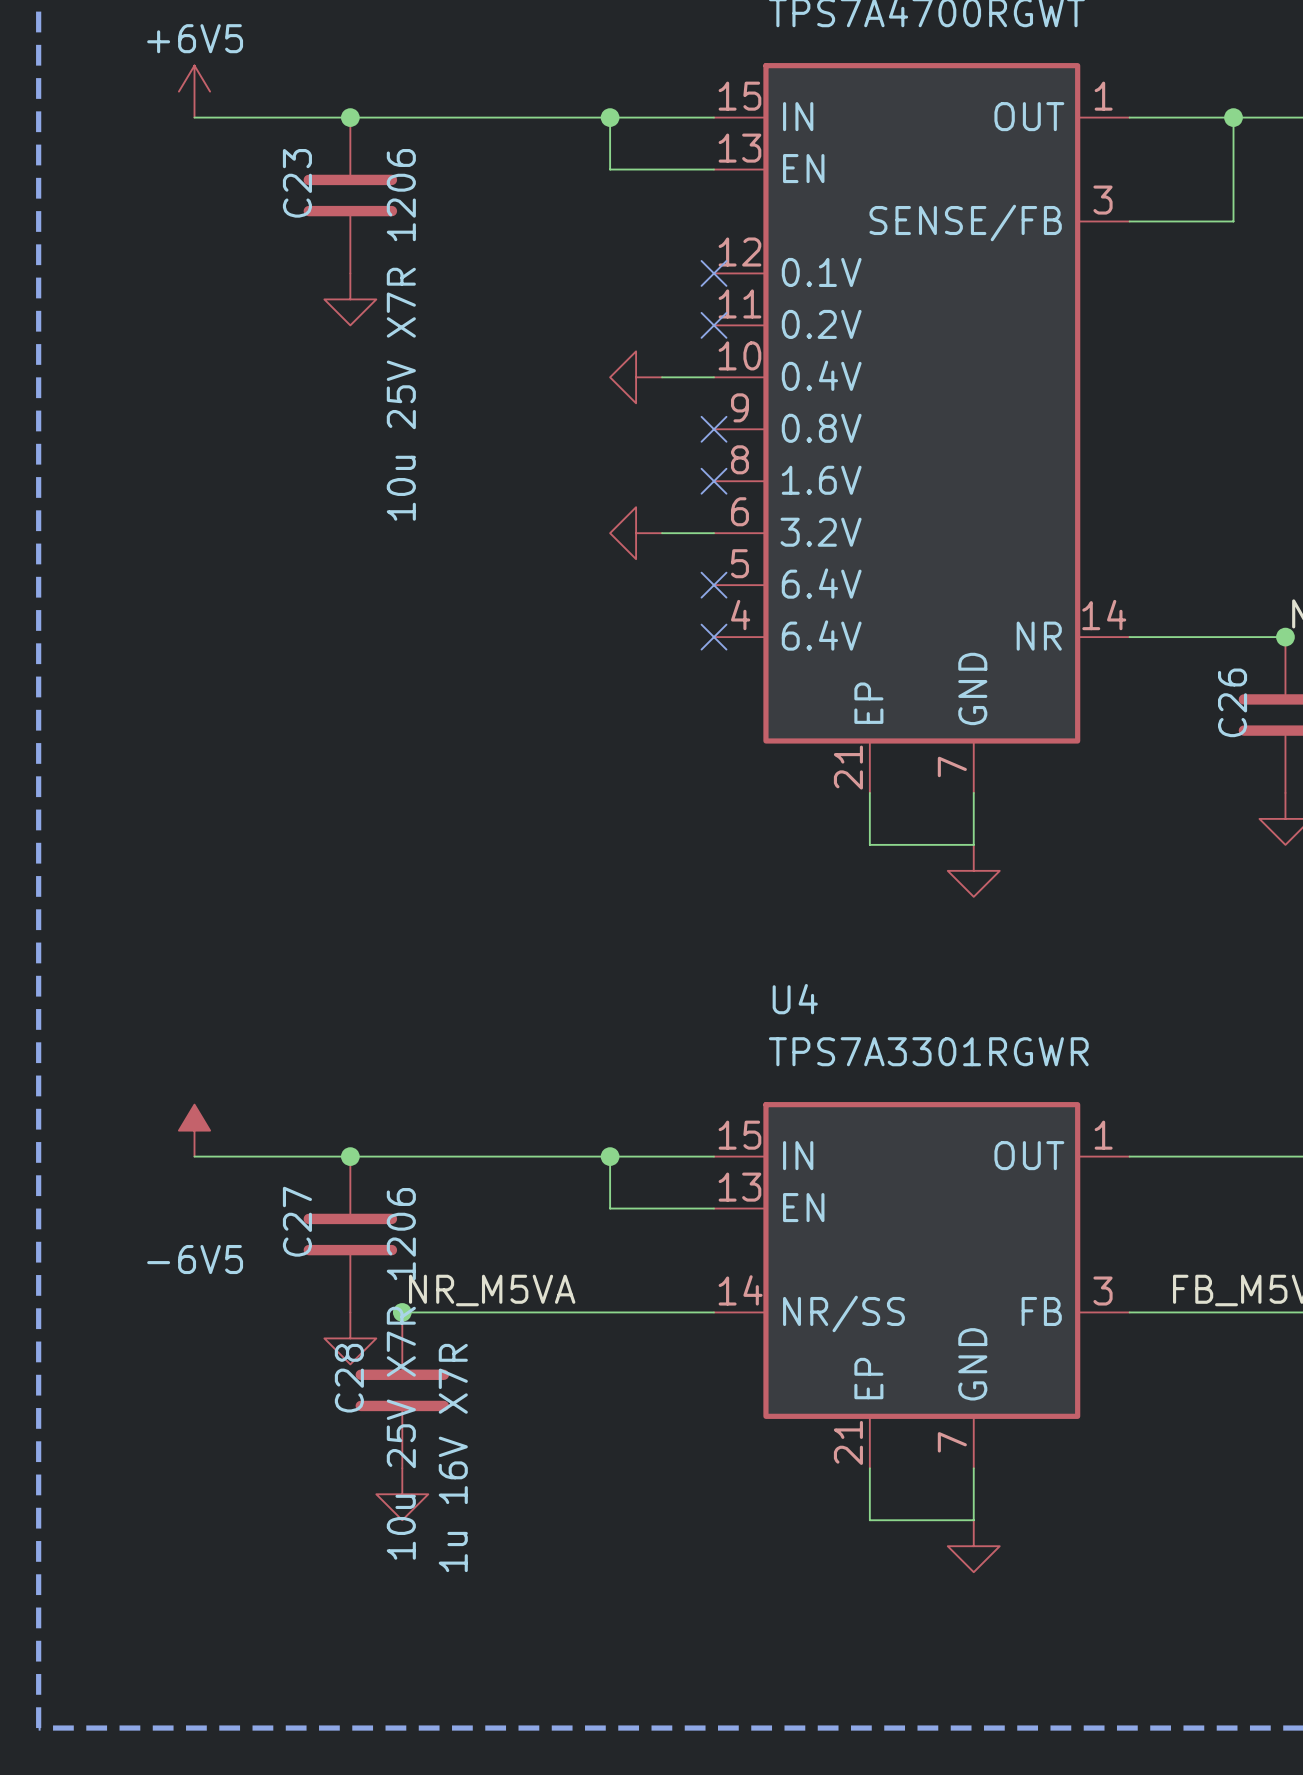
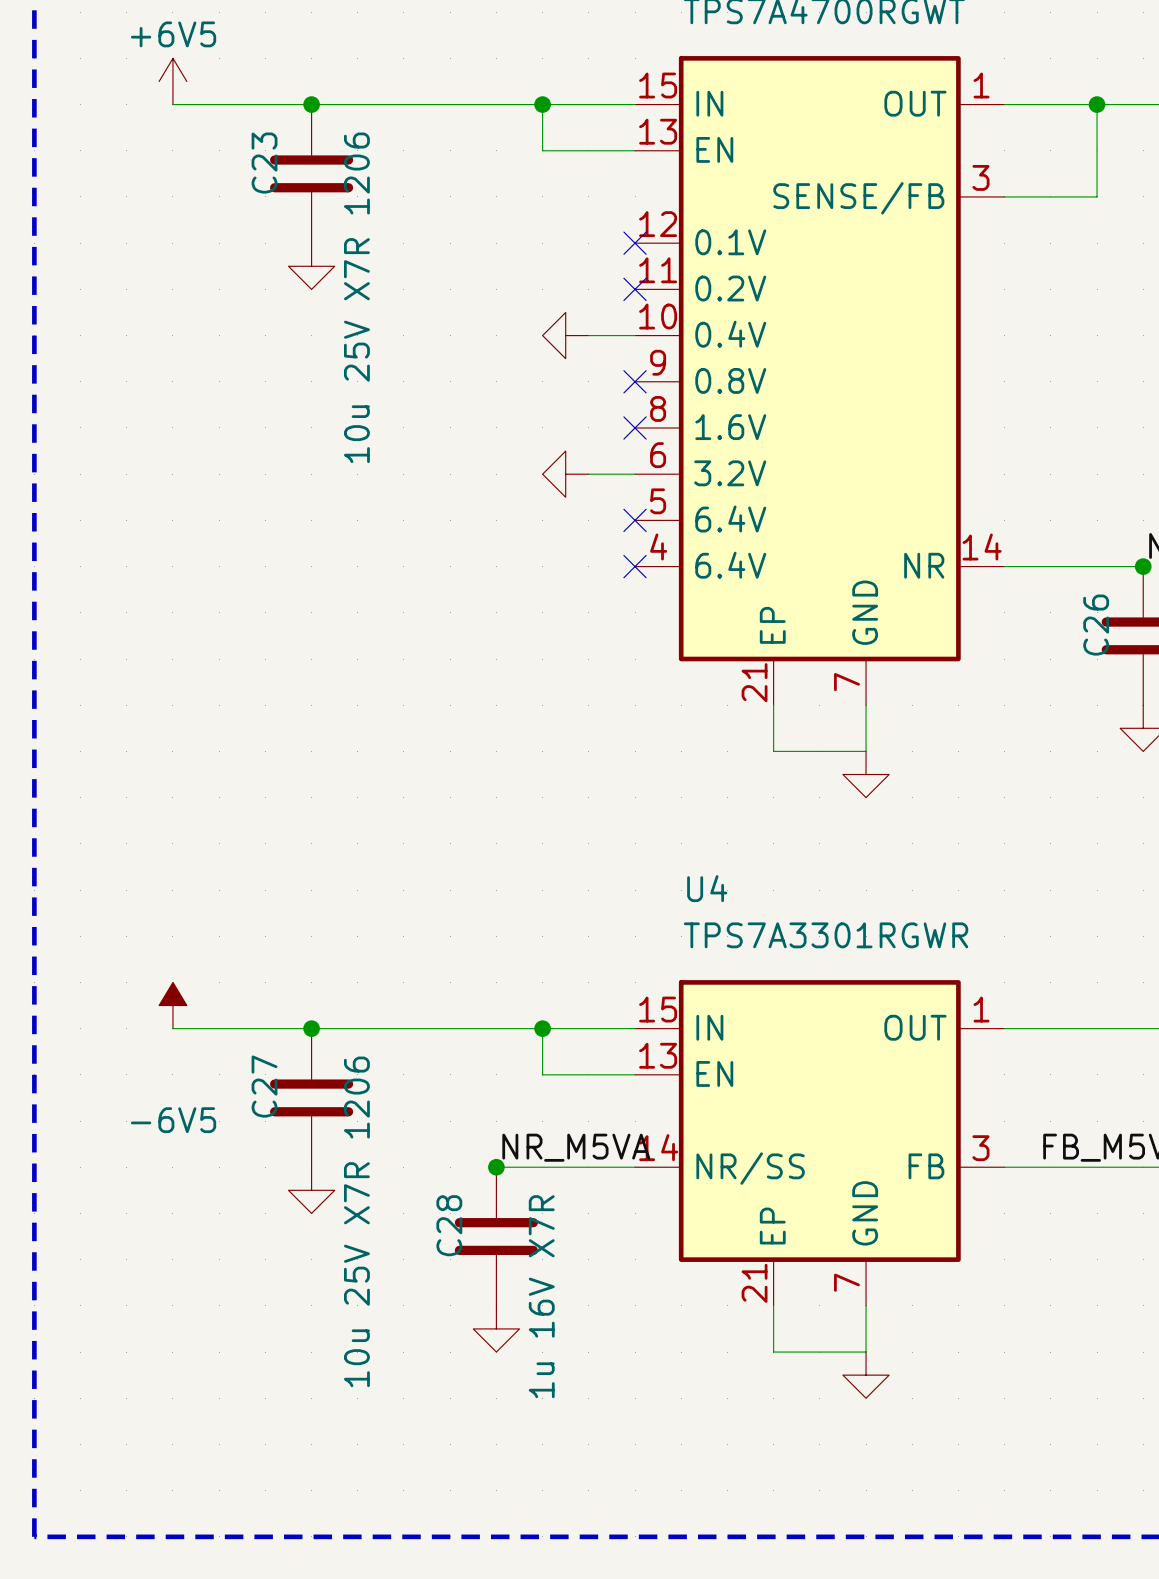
label position: NR_M5VA (492, 1290) -> NR_M5VA (576, 1147)
wire: (402, 1312) (558, 1312) -> none
junction: (402, 1312) -> none
junction: none -> (496, 1167)
C28 position: (402, 1390) -> (496, 1236)
power symbol position: (402, 1494) -> (496, 1328)

